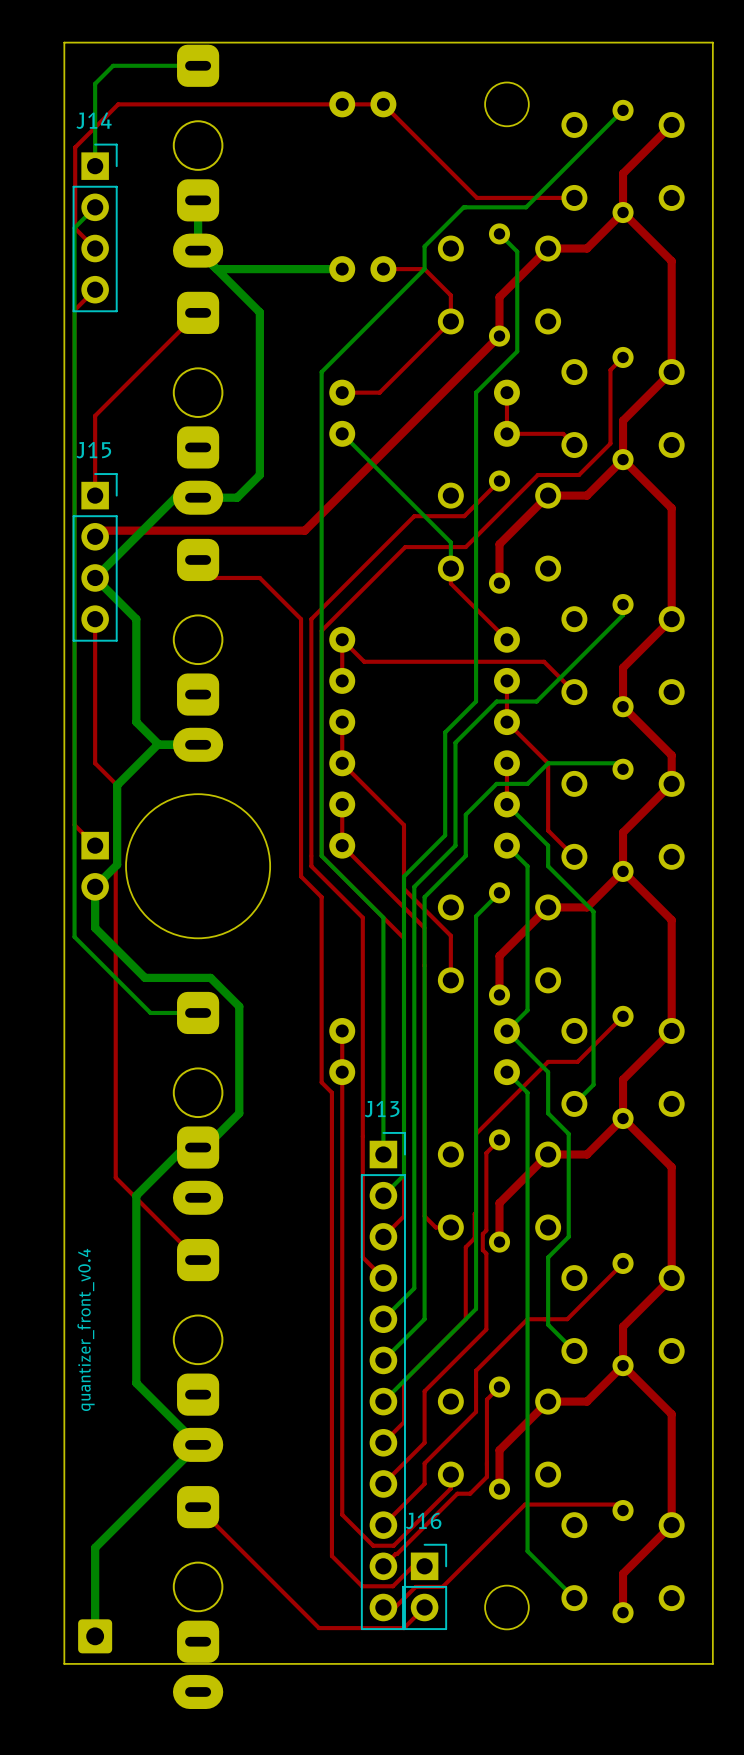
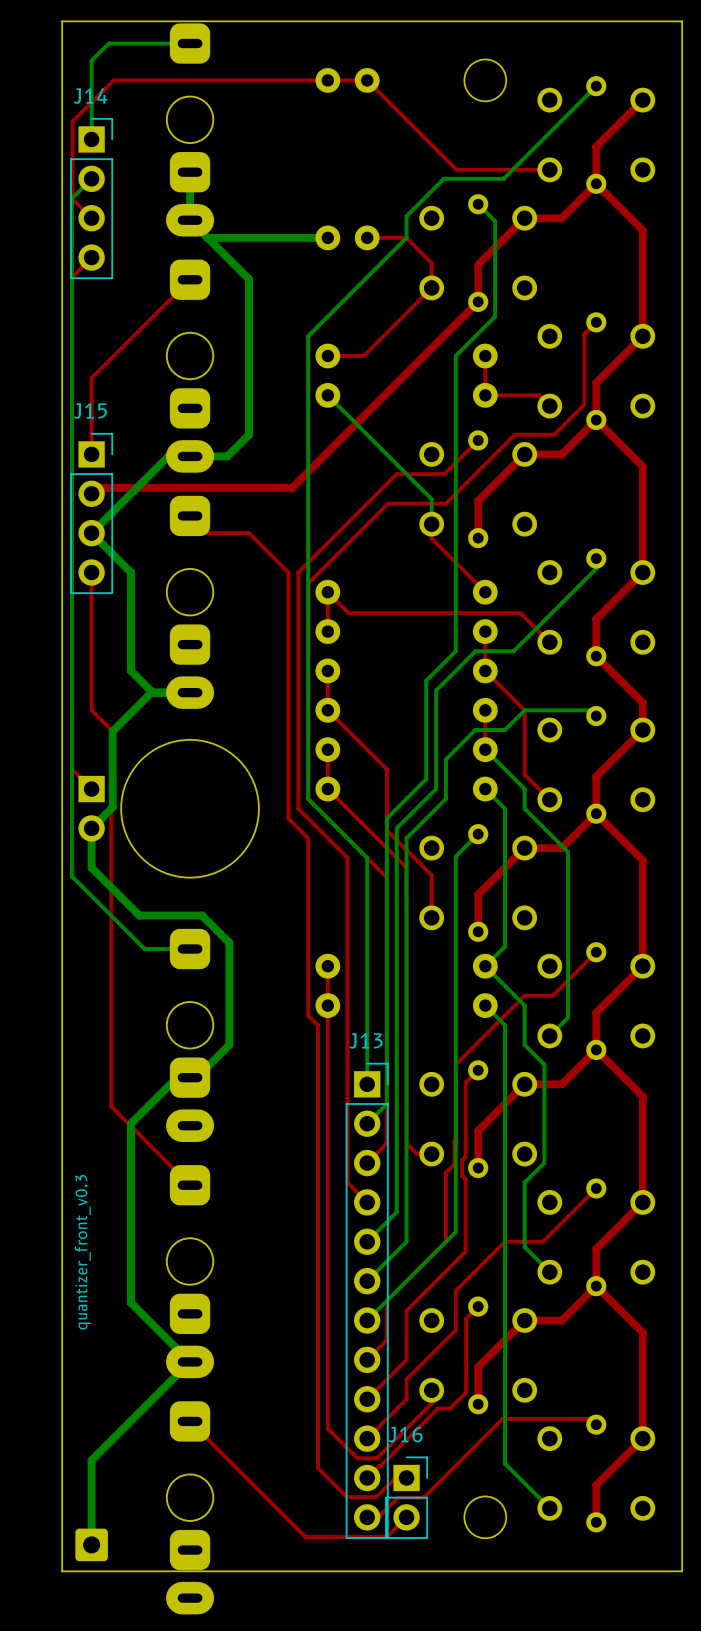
text: quantizer_front_v0.4 (86, 1329) -> quantizer_front_v0.3 (82, 1252)

